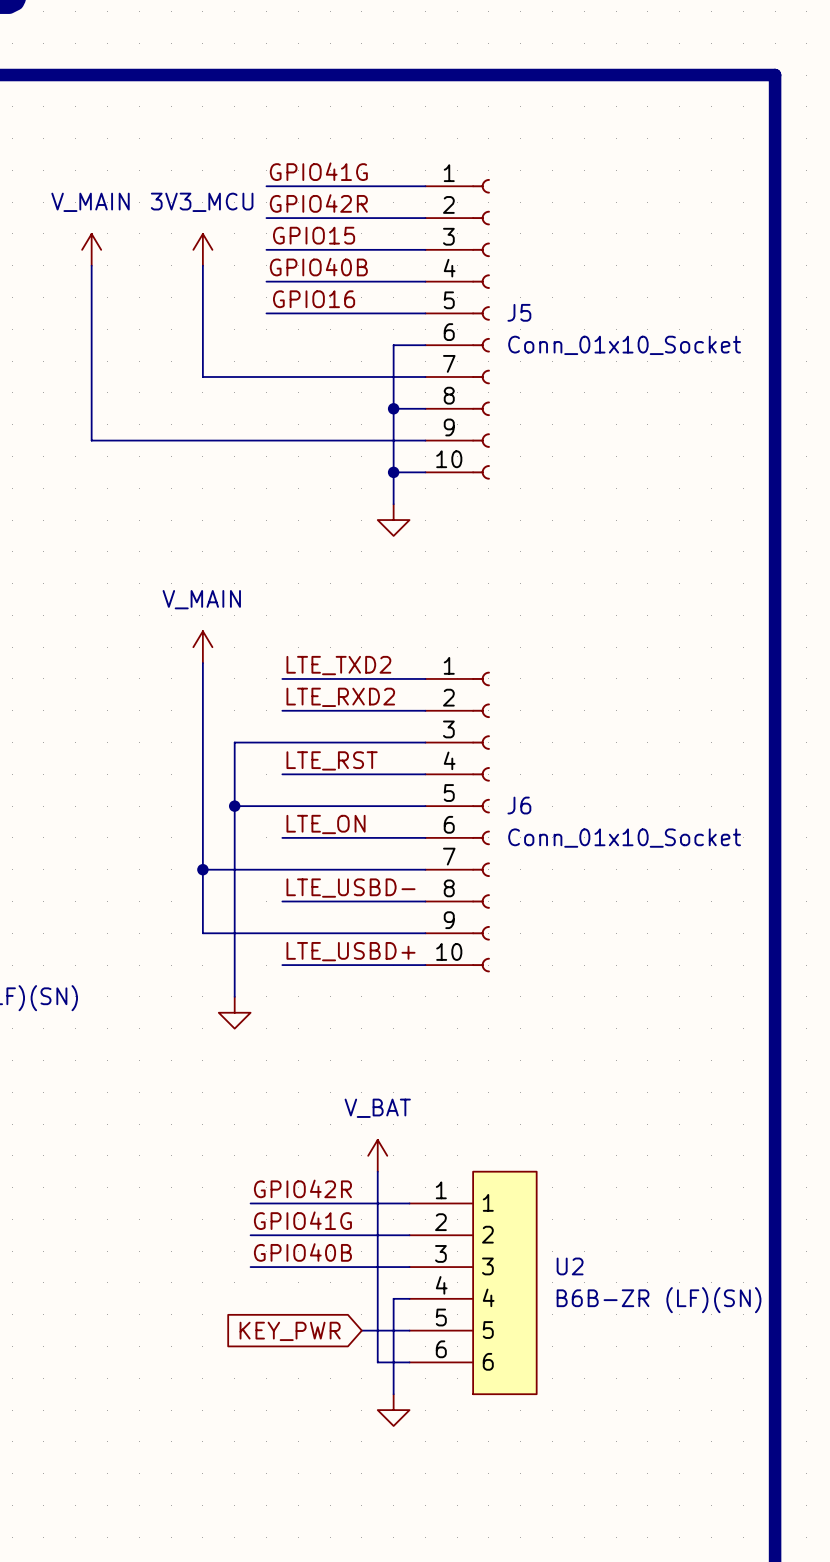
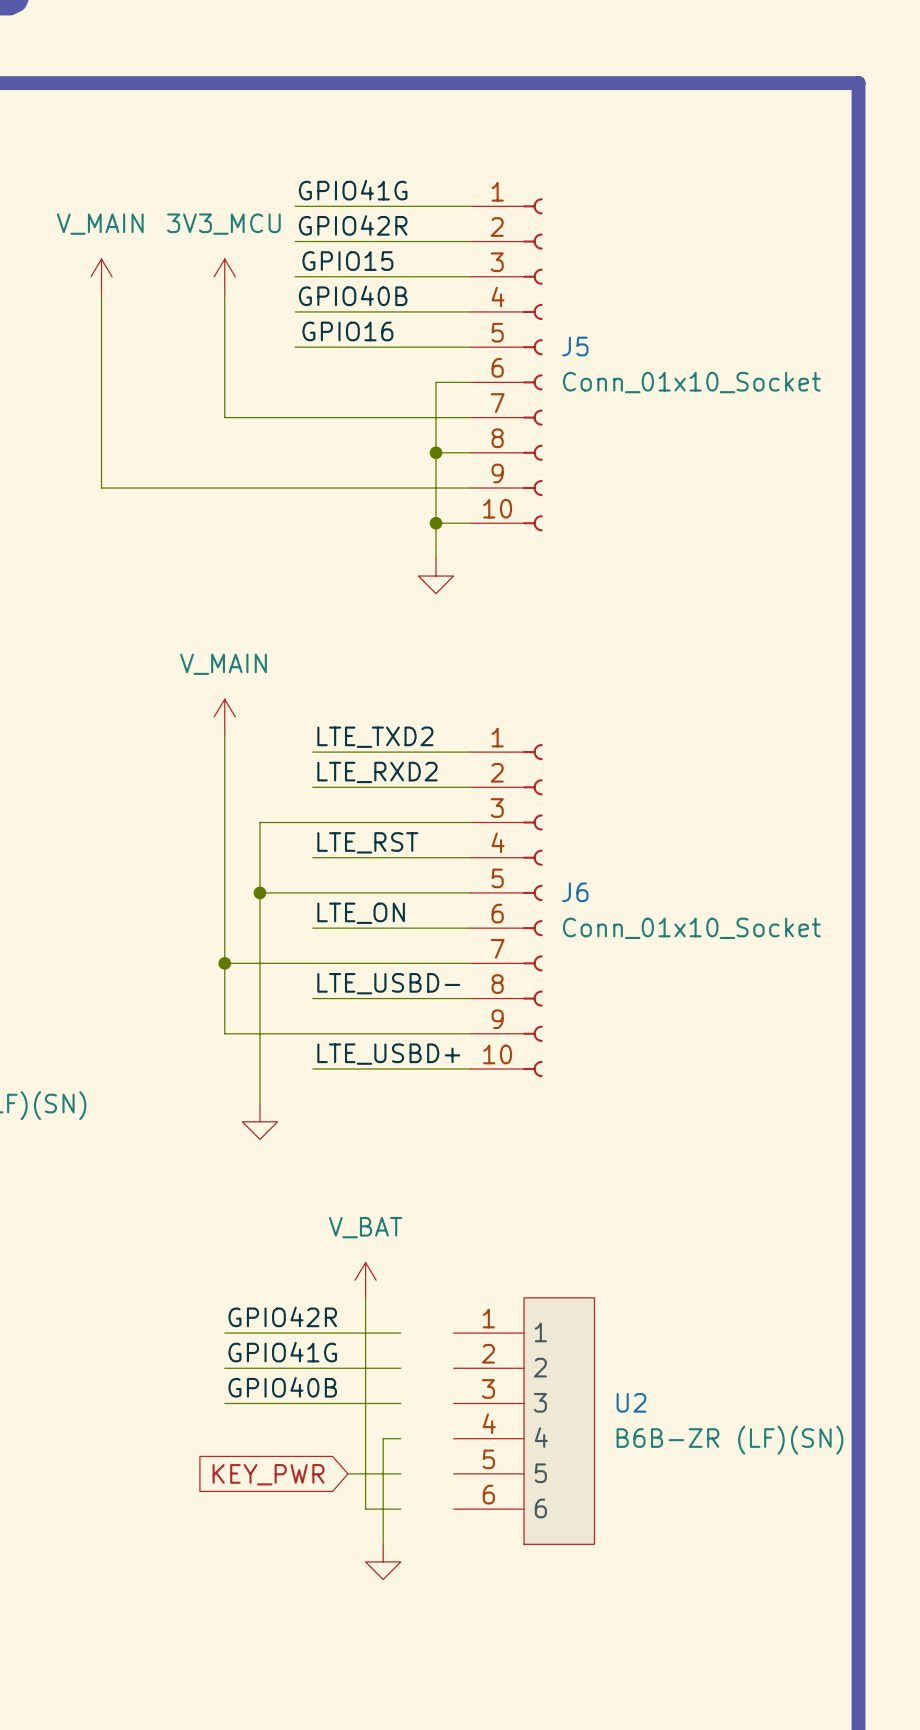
power symbol position: V_BAT (377, 1155) -> V_BAT (365, 1280)
wire: (377, 1171) (377, 1362) (409, 1362) -> (365, 1297) (365, 1509) (400, 1509)
label position: GPIO42R (302, 1188) -> GPIO42R (282, 1316)
wire: (361, 1203) (409, 1203) -> (224, 1333) (277, 1333)
label position: GPIO41G (302, 1220) -> GPIO41G (282, 1352)
wire: (361, 1235) (409, 1235) -> (224, 1368) (277, 1368)
label position: GPIO40B (302, 1252) -> GPIO40B (282, 1387)
wire: (361, 1267) (409, 1267) -> (224, 1403) (277, 1403)
wire: (409, 1298) (393, 1298) (393, 1394) -> (400, 1438) (383, 1438) (383, 1544)
wire: (361, 1330) (409, 1330) -> (400, 1473) (347, 1473)
global label position: KEY_PWR (290, 1331) -> KEY_PWR (268, 1474)
power symbol position: (393, 1410) -> (383, 1561)

